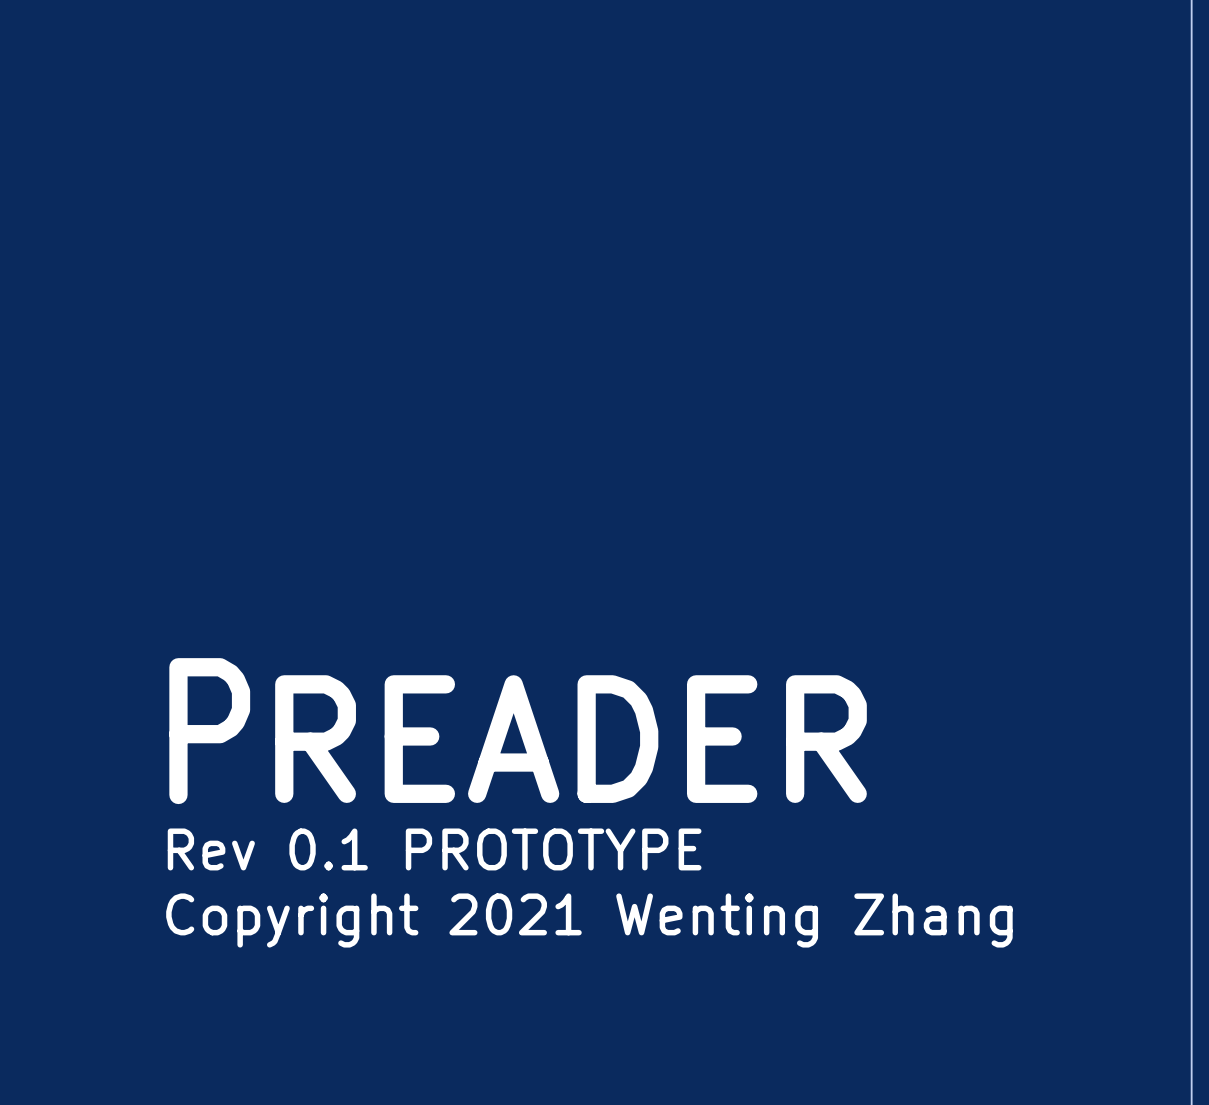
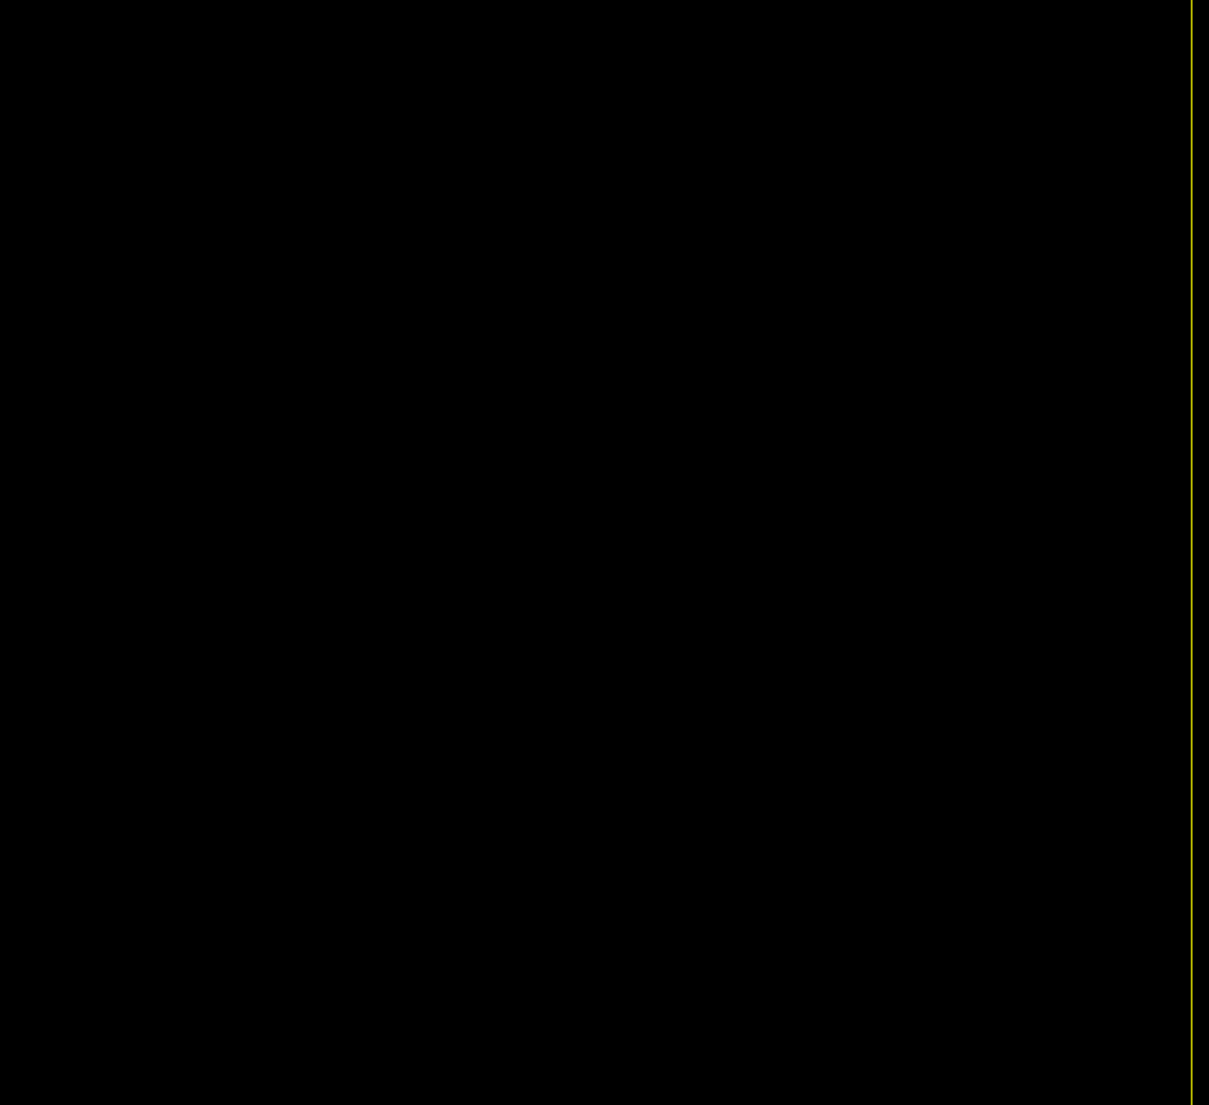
text: P (209, 731) -> none
text: READER (571, 739) -> none
text: Rev 0.1 PROTOTYPE (434, 849) -> none
text: Copyright 2021 Wenting Zhang (589, 920) -> none

